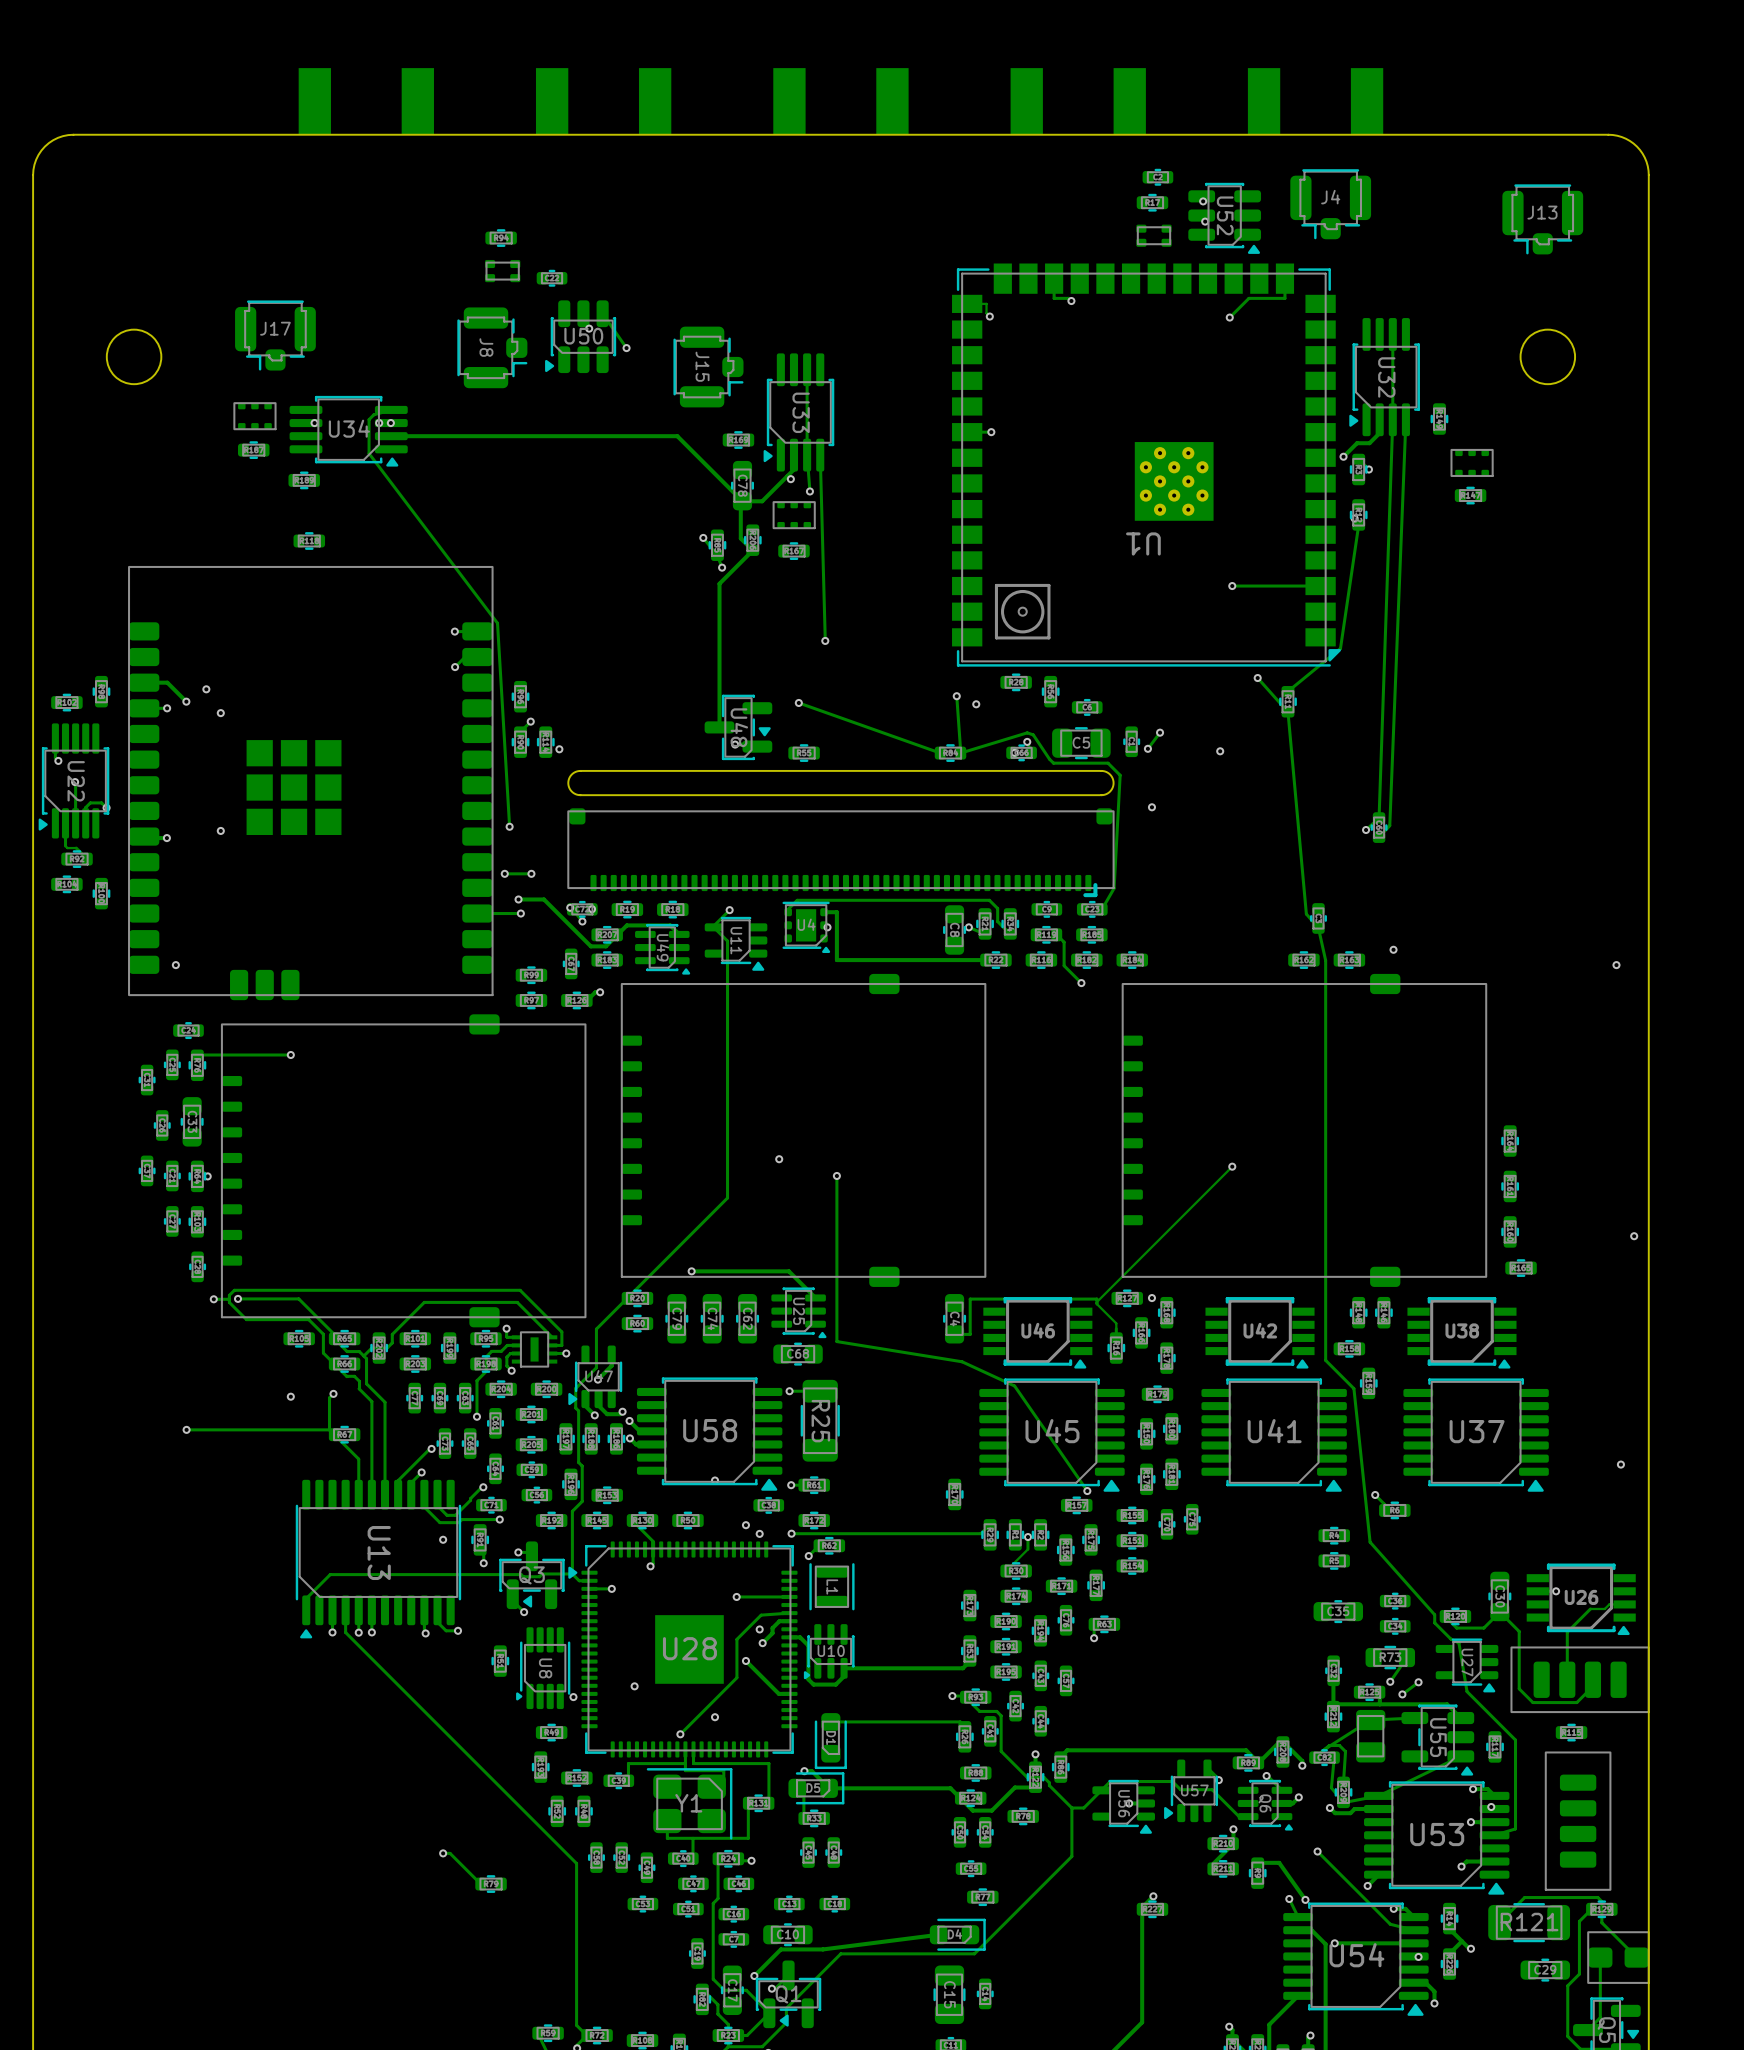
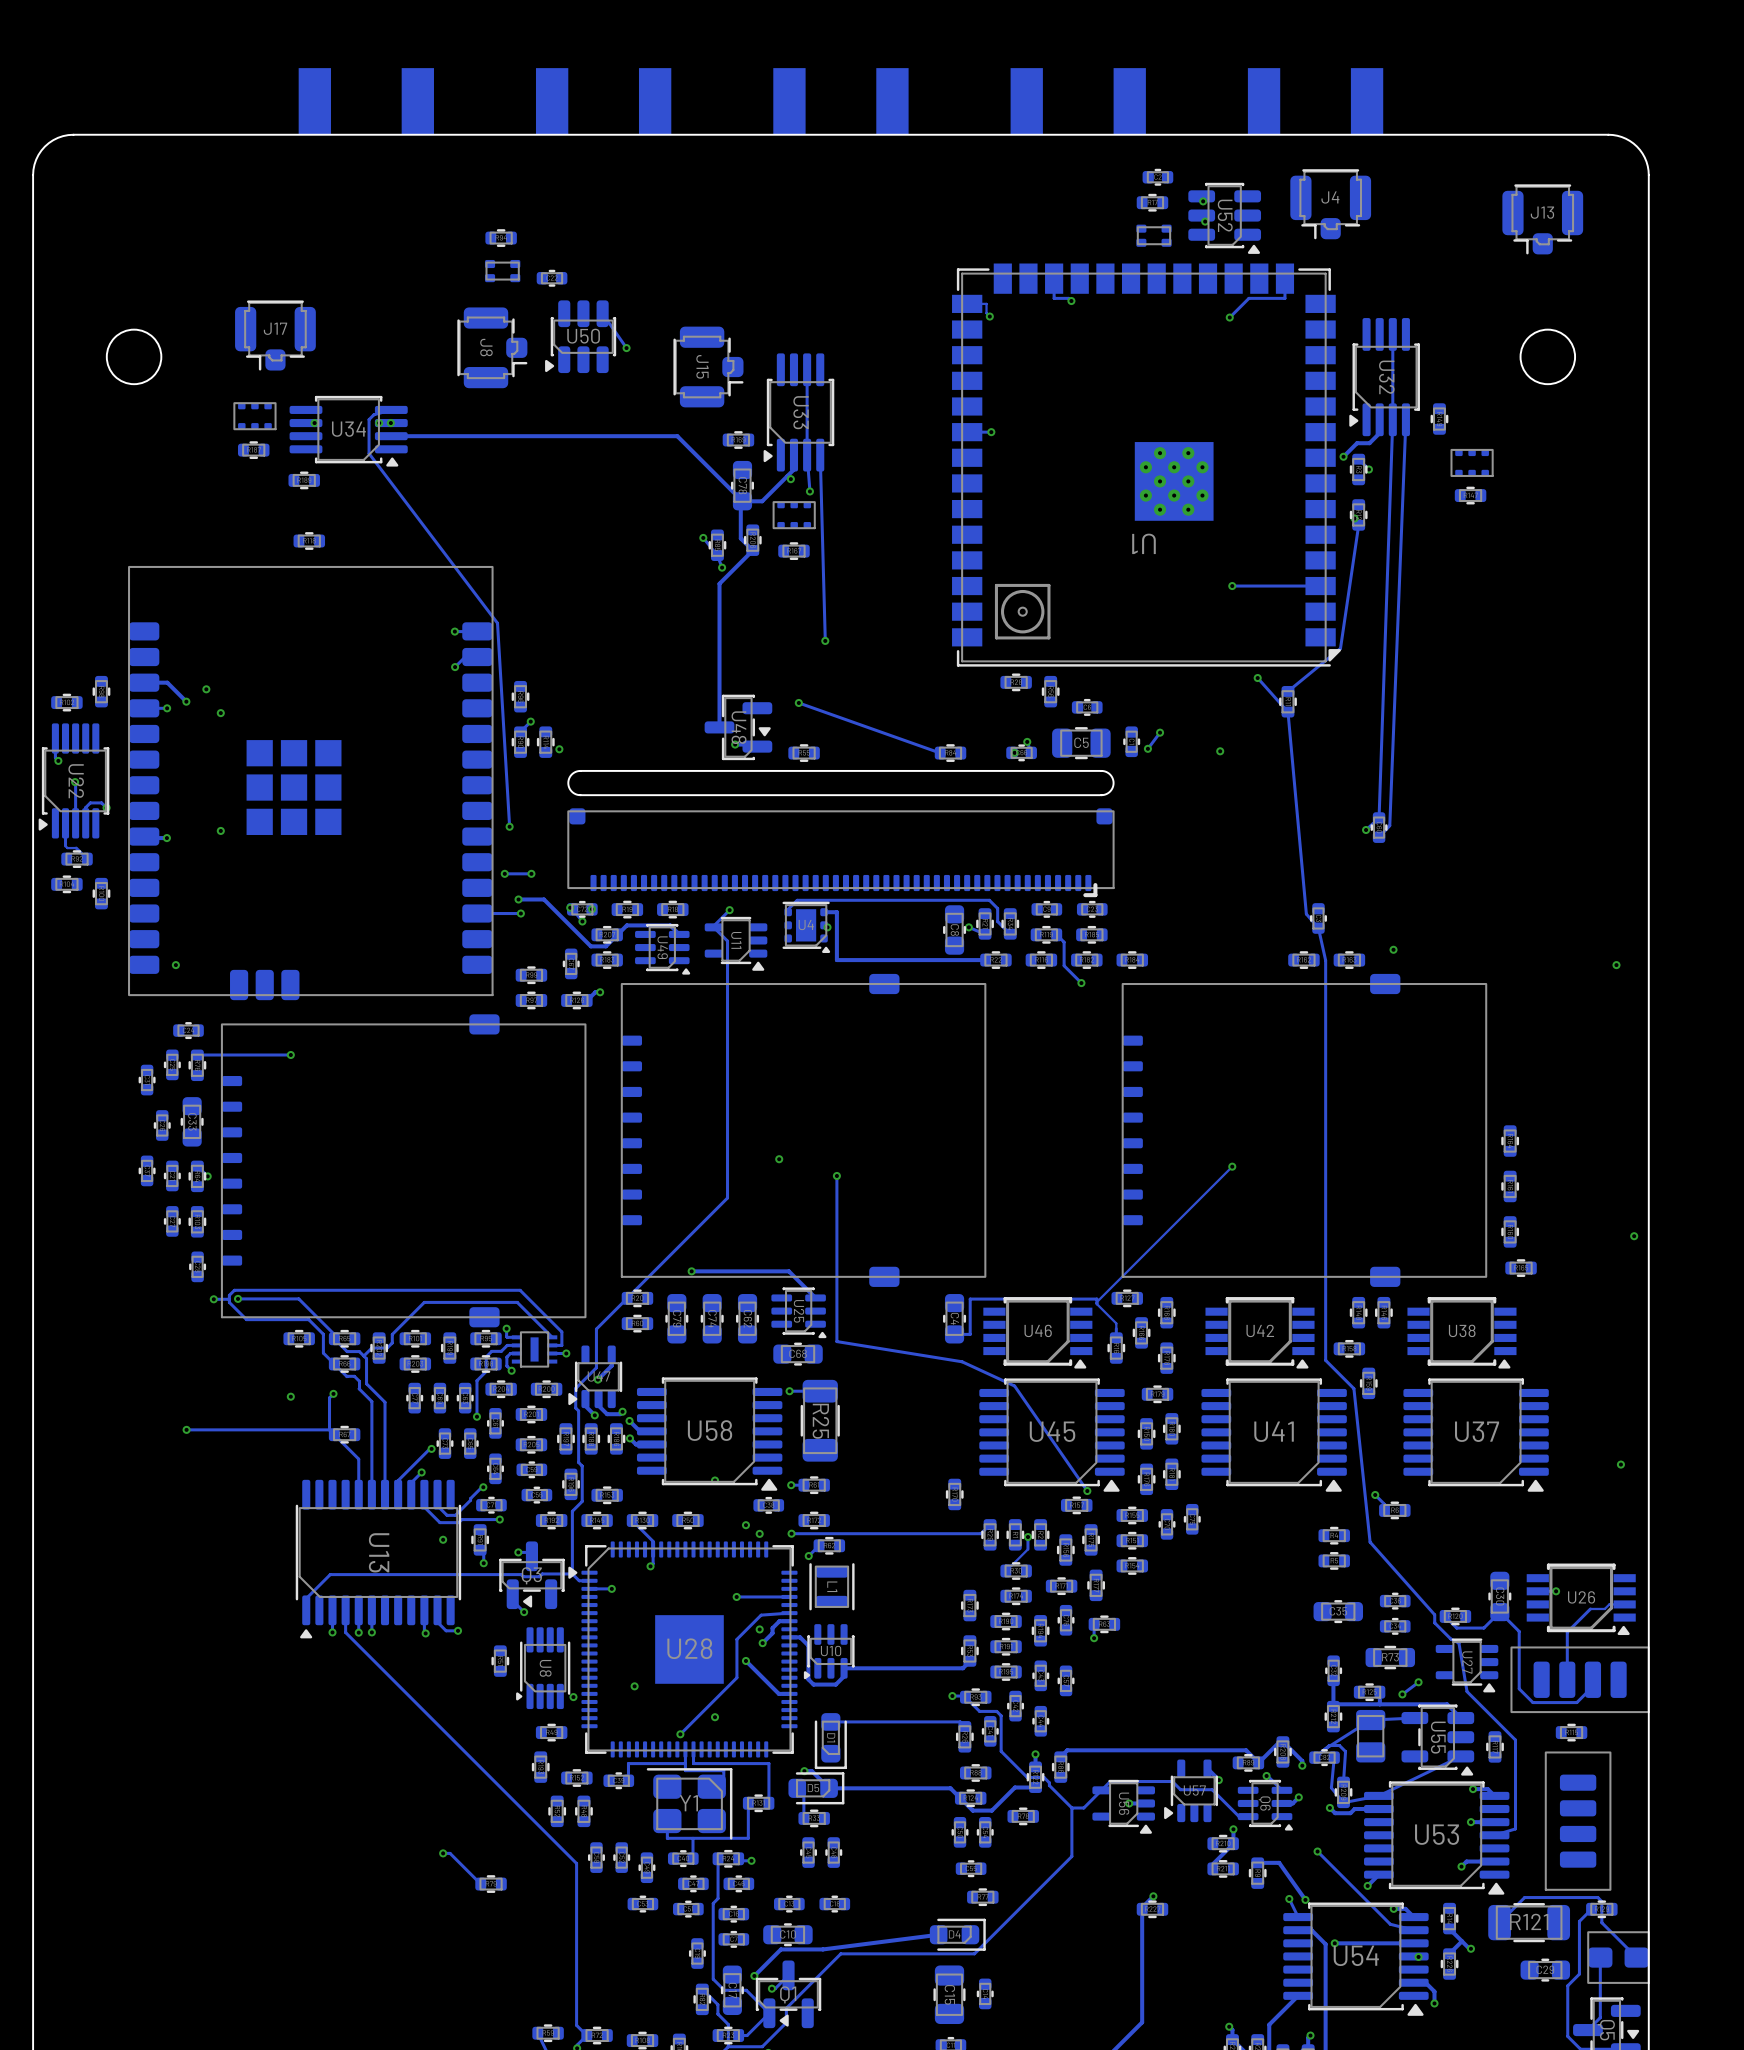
via: (589, 328) -> none
track: (956, 696) (960, 753) (1027, 732) (1033, 734) (1053, 763) (1108, 763) (1120, 775) (1114, 888) (1101, 909) -> none
via: (956, 696) -> none
via: (976, 704) -> none
via: (1151, 807) -> none
via: (1151, 1298) -> none
track: (1406, 1657) (1390, 1681) -> none
via: (1390, 1681) -> none
via: (1491, 1807) -> none

